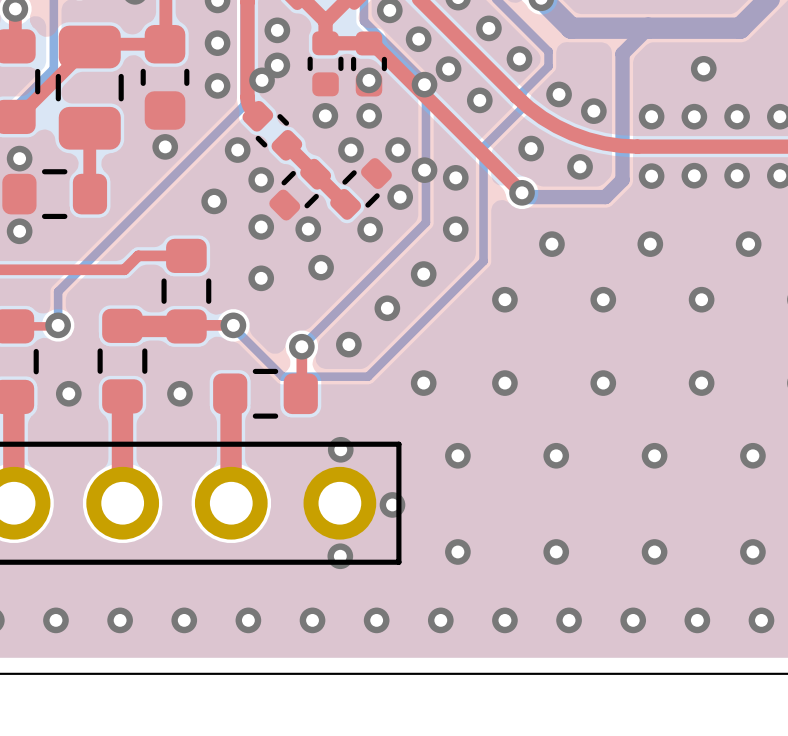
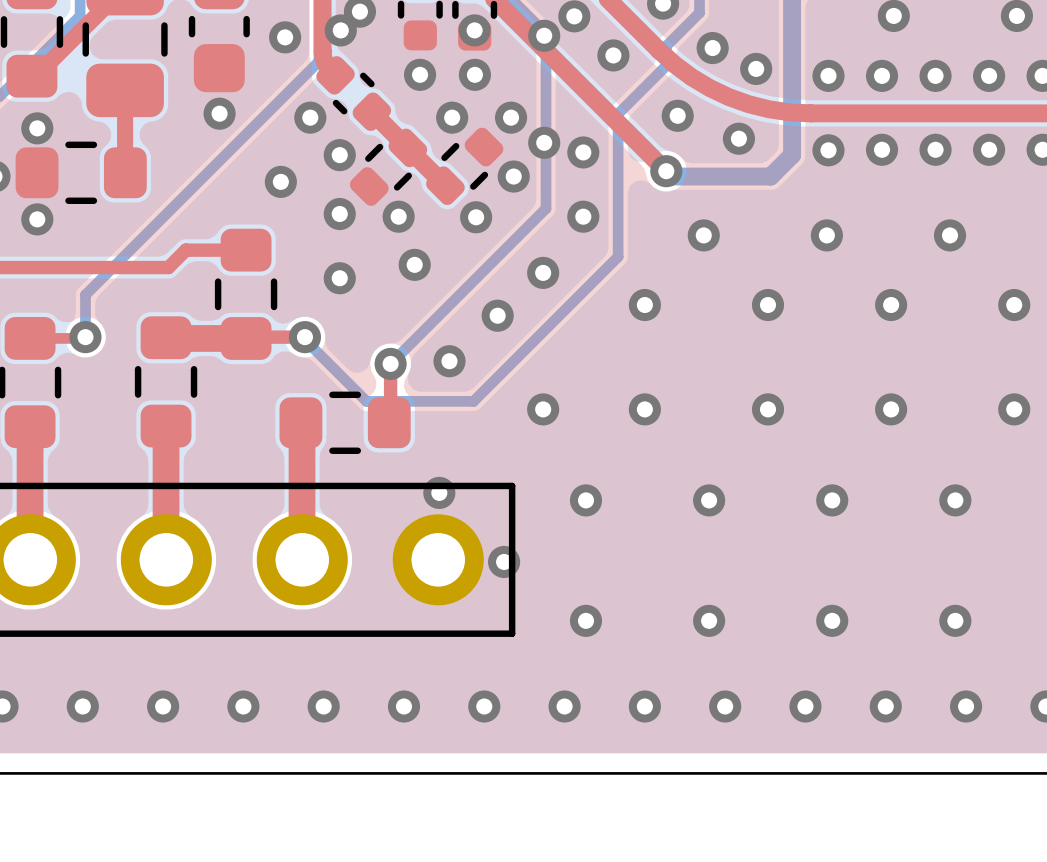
via: (68, 393) -> none
via: (179, 393) -> none
via: (340, 556) -> none

